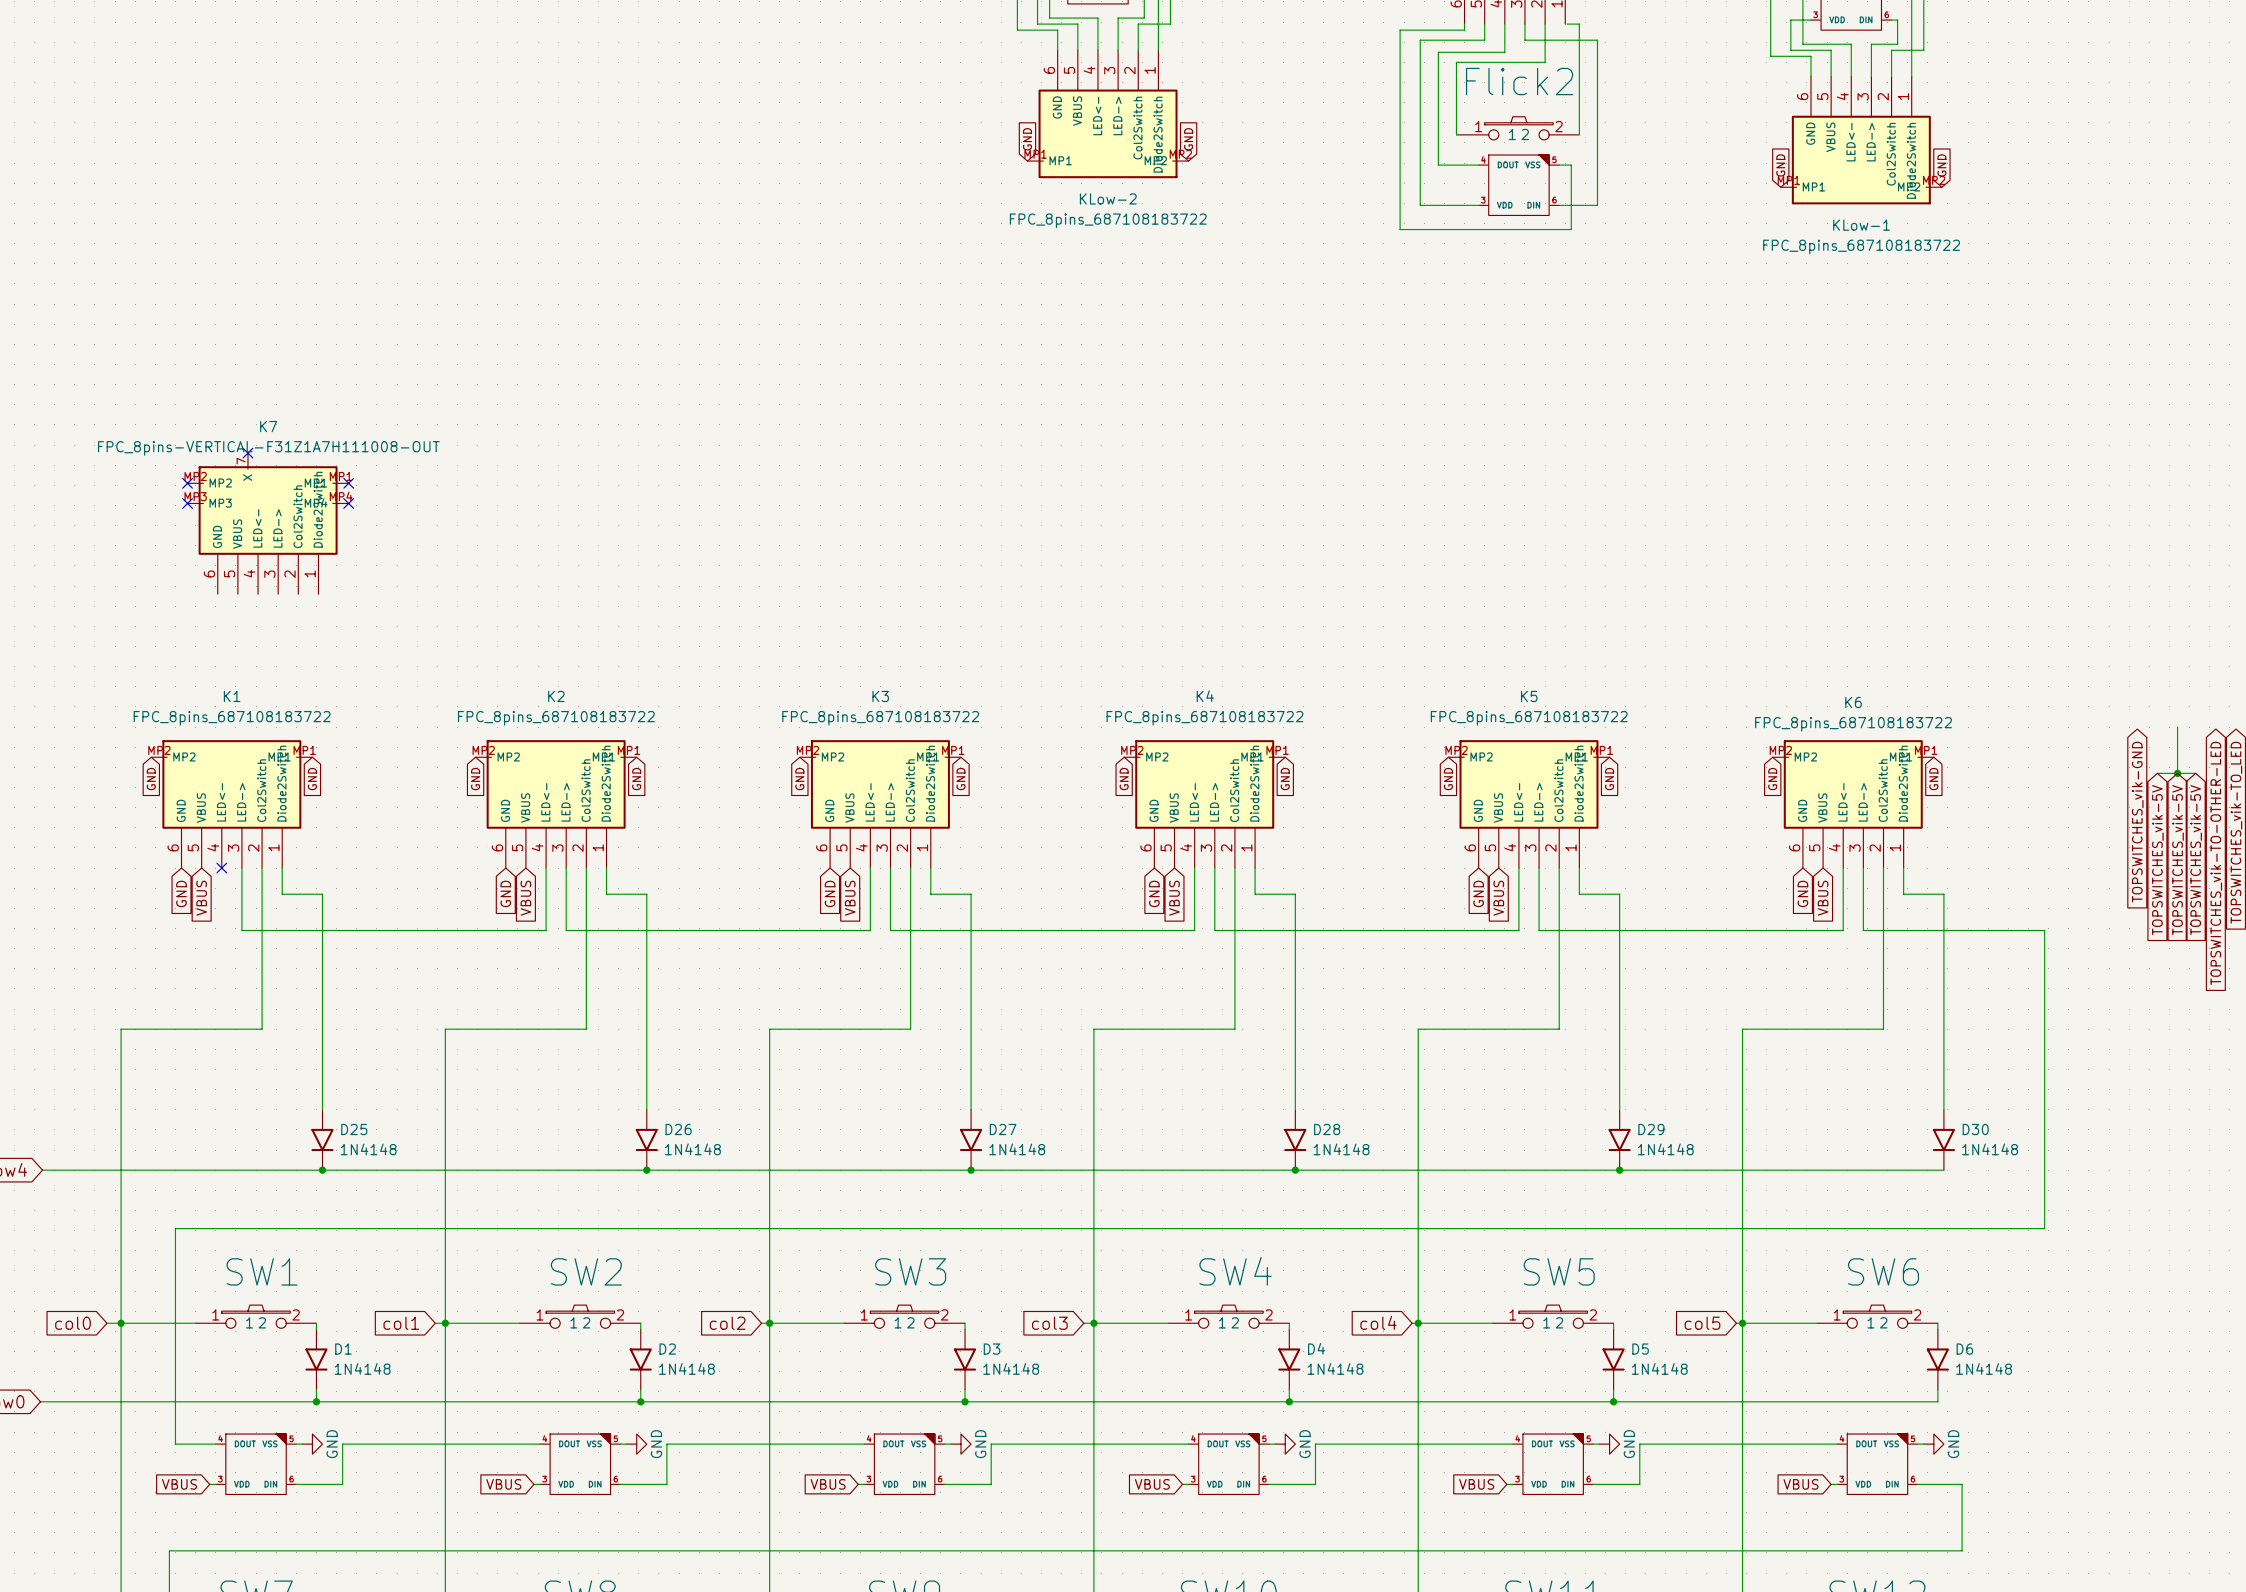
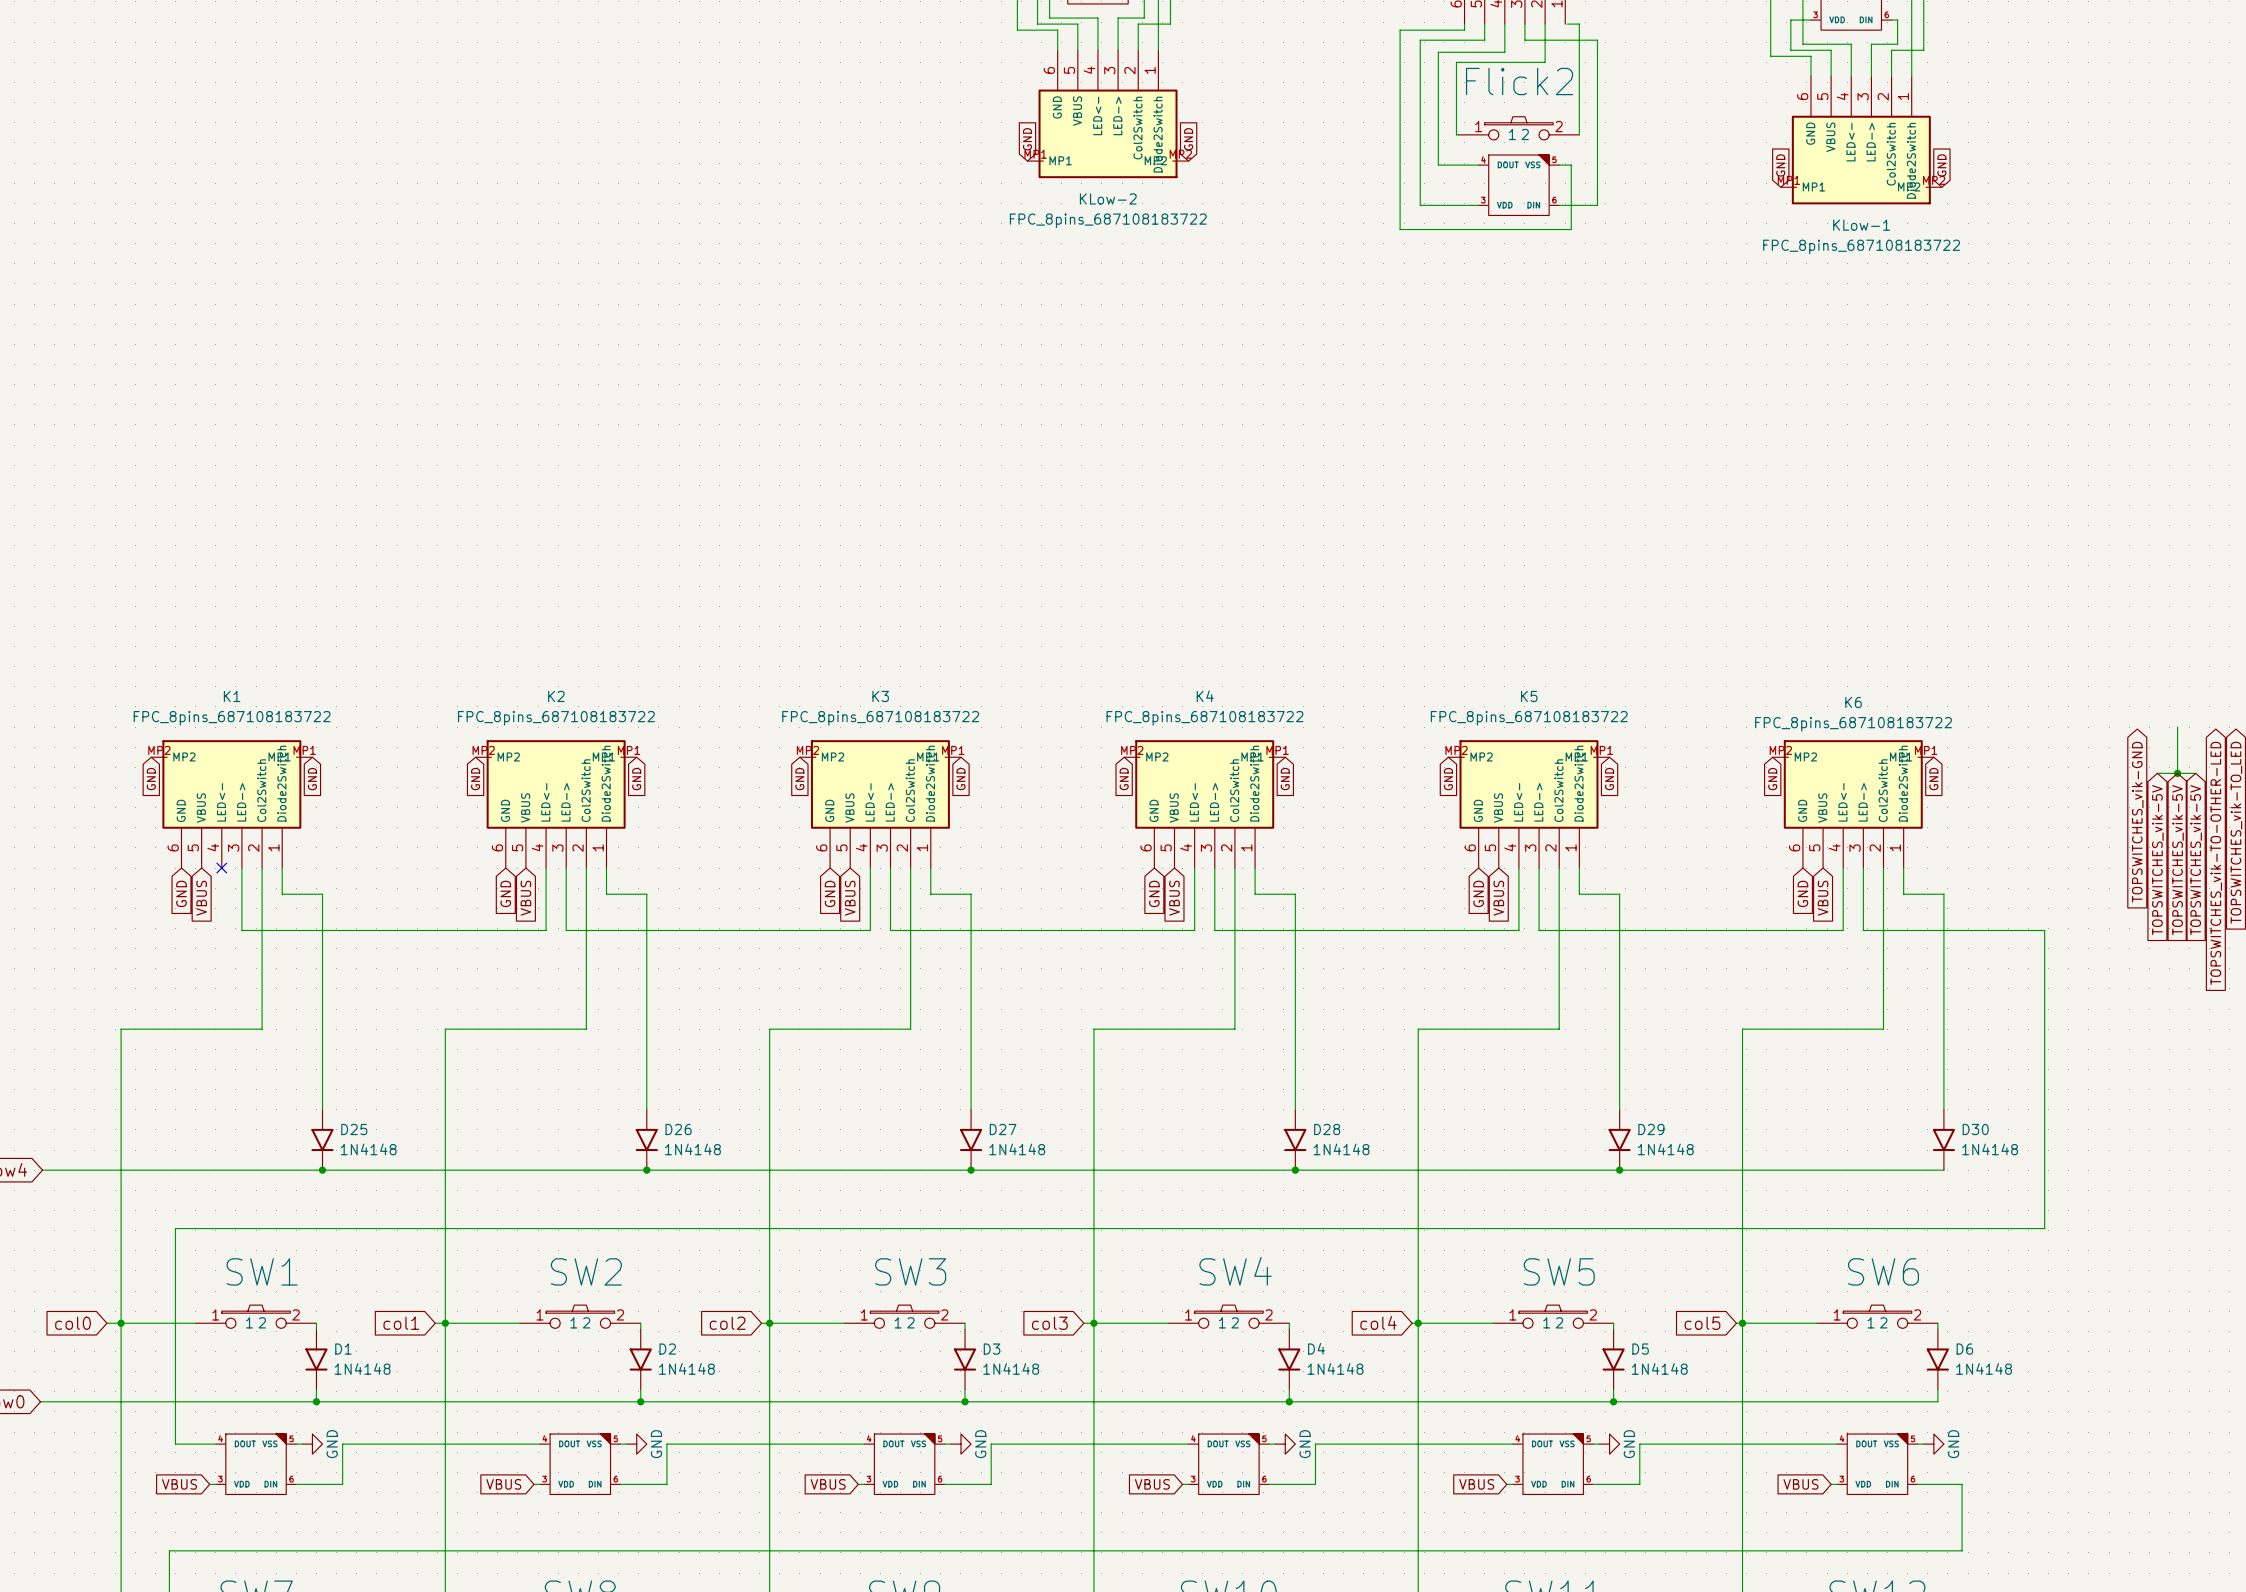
no-connect mark: (247, 453) -> none
no-connect mark: (187, 483) -> none
no-connect mark: (348, 483) -> none
no-connect mark: (187, 503) -> none
no-connect mark: (348, 503) -> none
K7: FPC_8pins-VERTICAL-F31Z1A7H111008-OUT (268, 523) -> none

